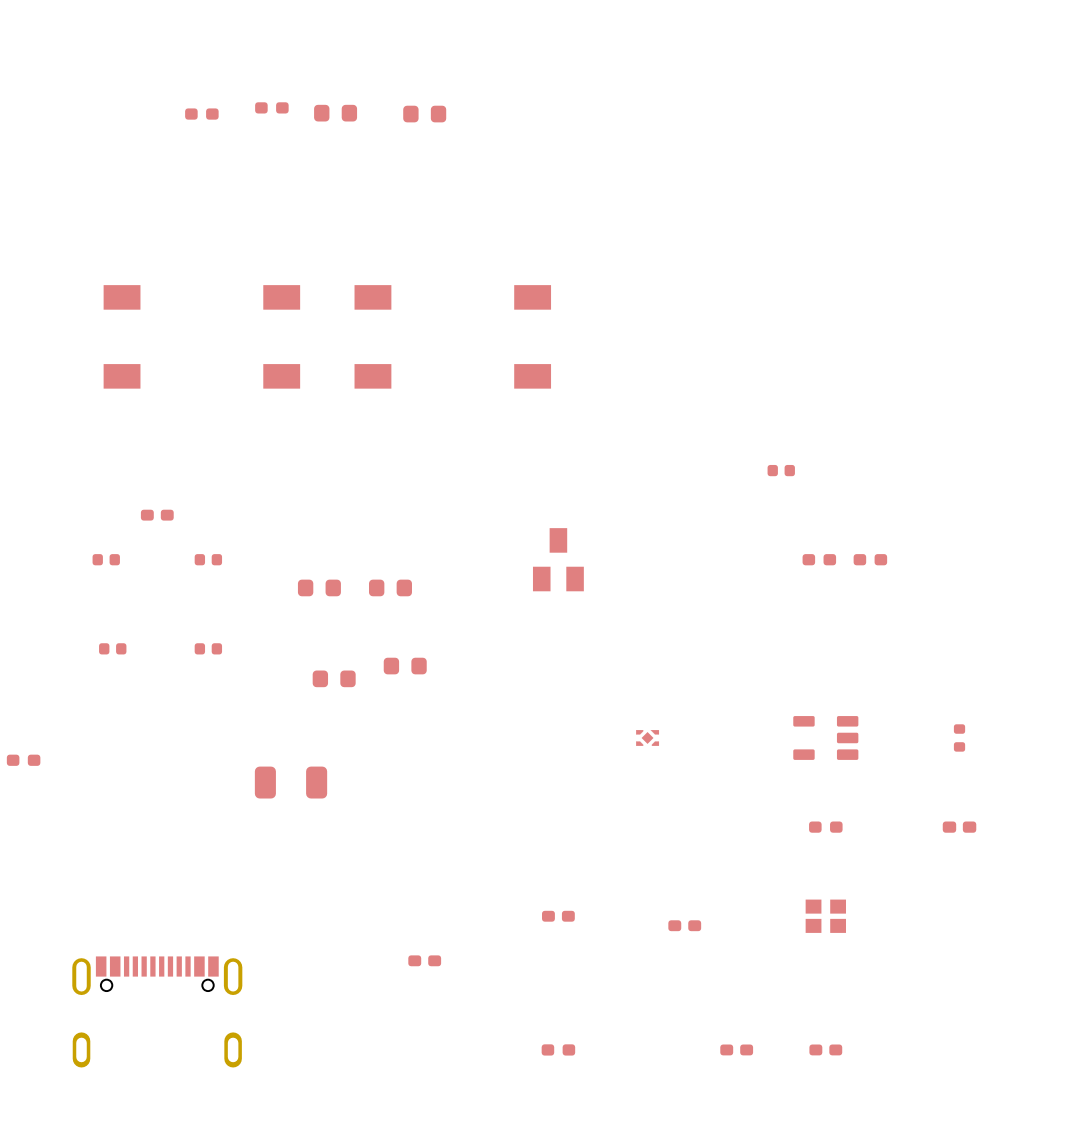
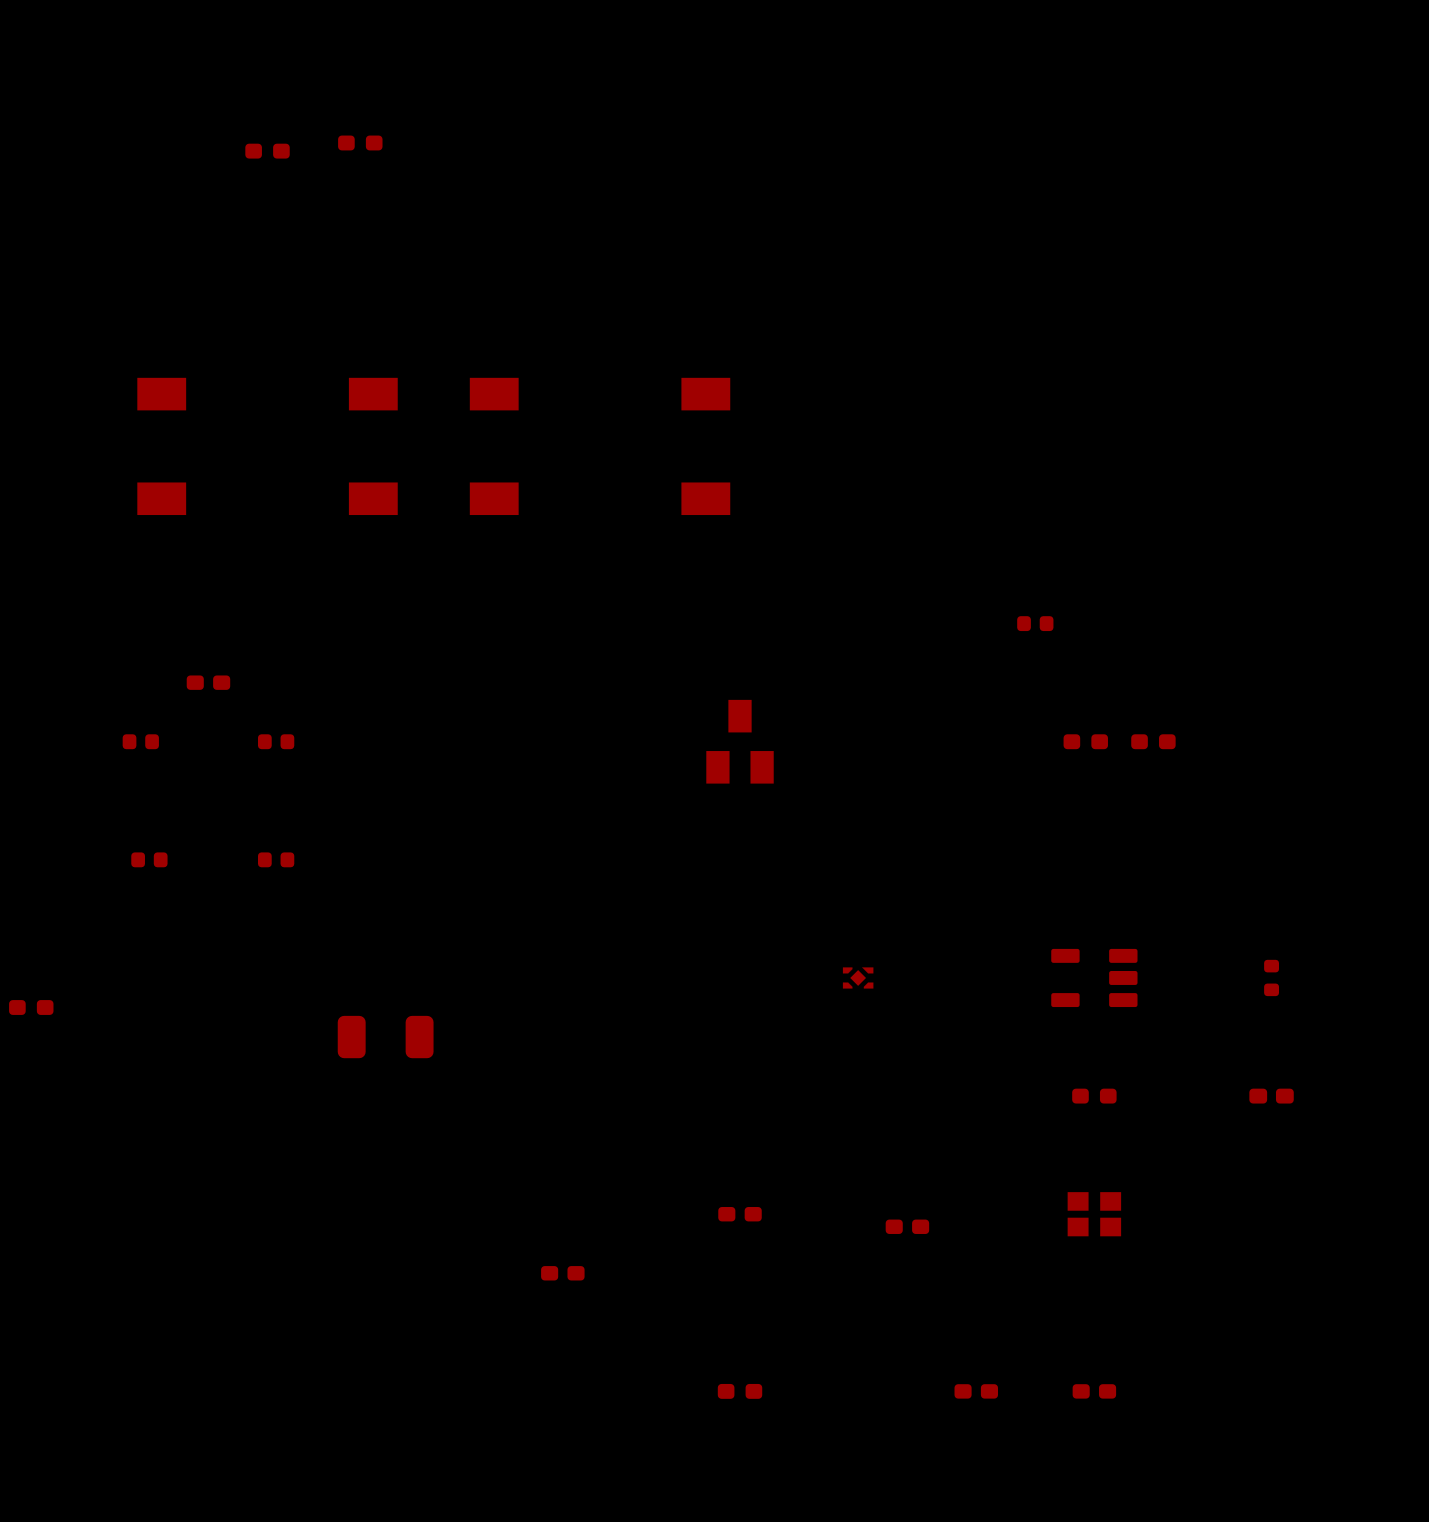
part: (335, 113) -> none
part: (424, 114) -> none
part: (319, 587) -> none
part: (390, 587) -> none
part: (405, 666) -> none
part: (334, 678) -> none
part: (157, 1011) -> none

